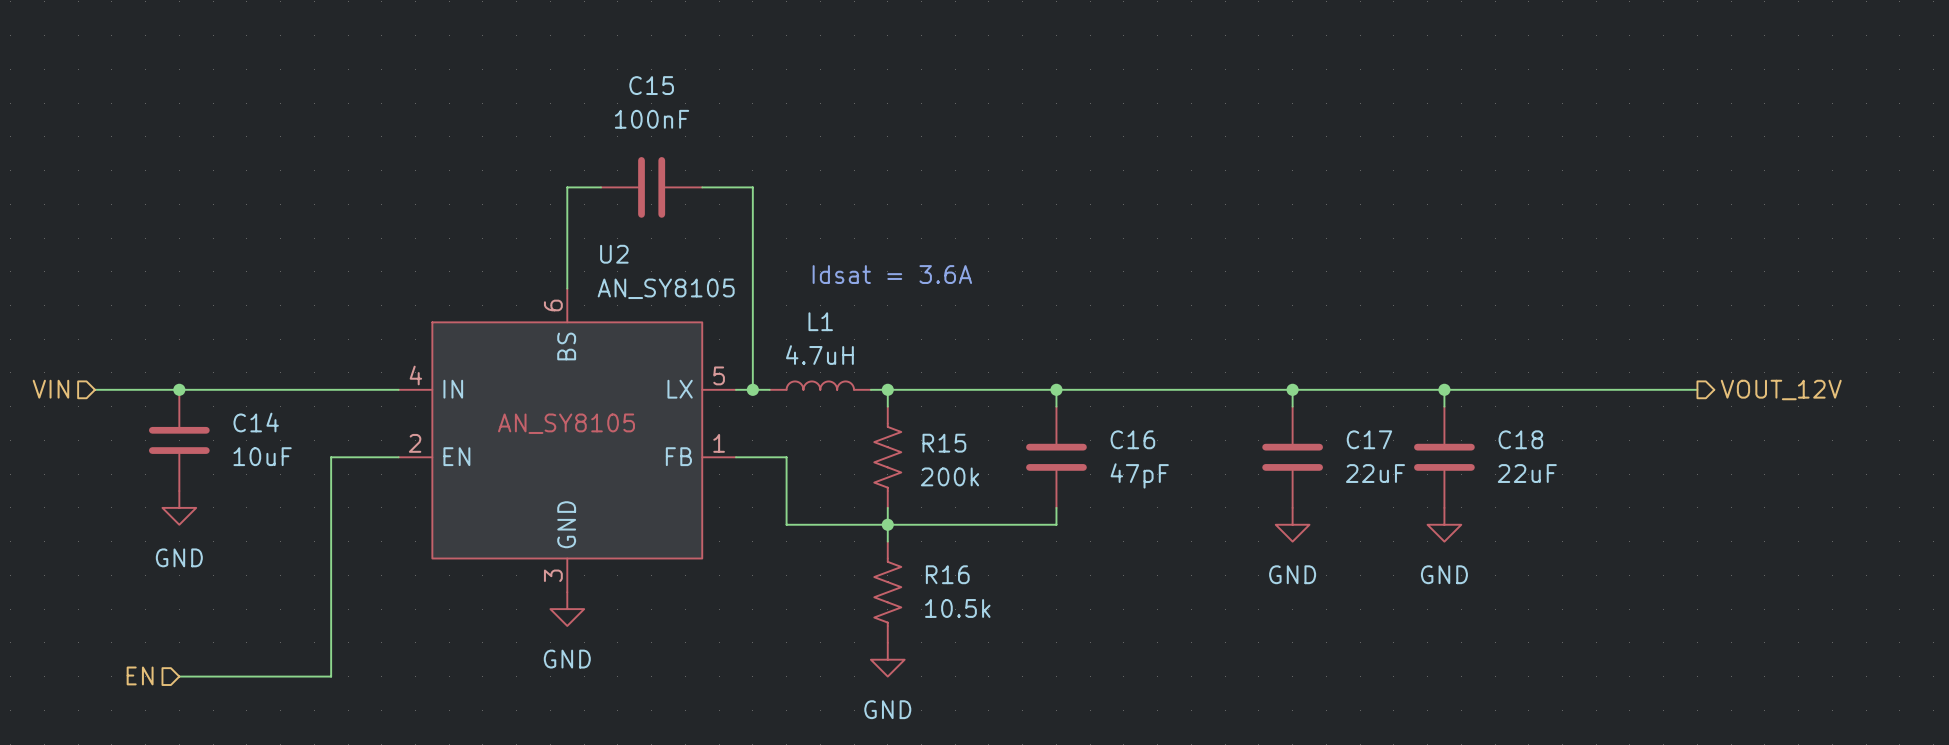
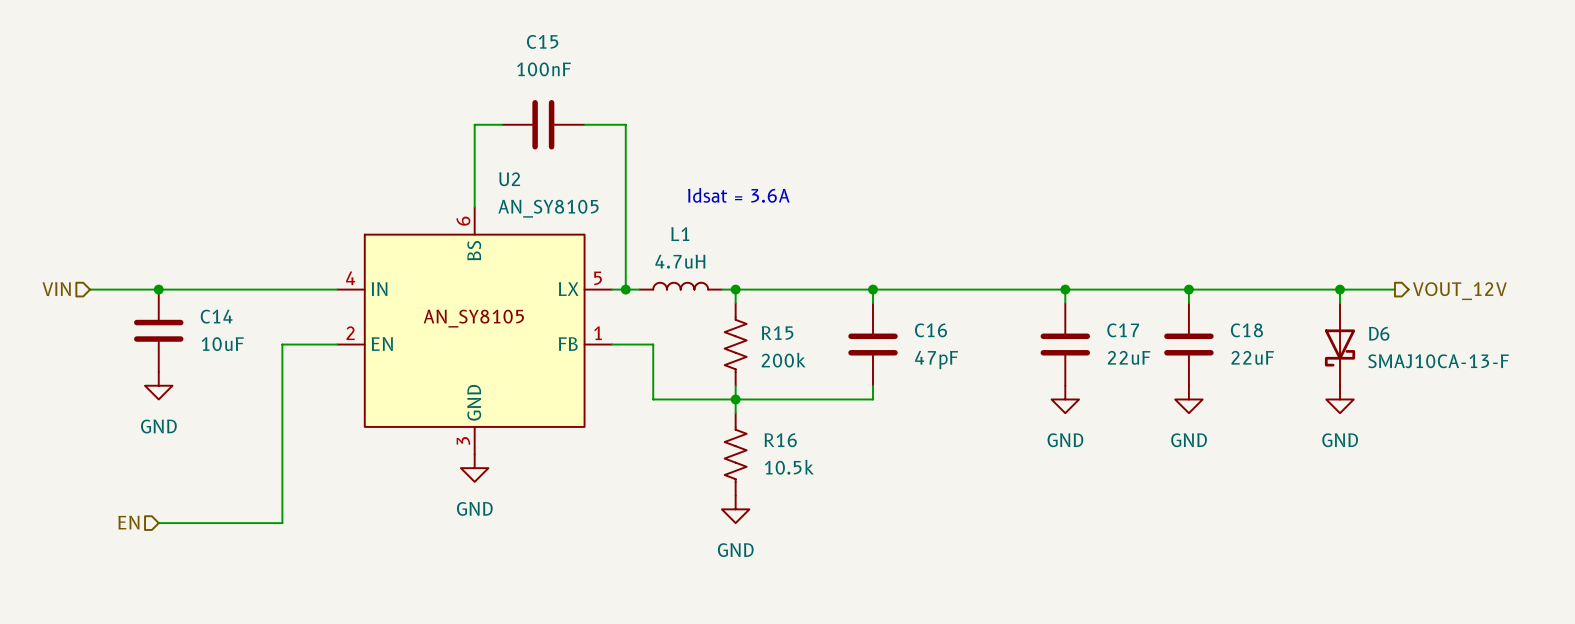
wire: none -> (1340, 289) (1340, 303)
junction: none -> (1340, 289)
D6: none -> SMAJ10CA-13-F (1340, 344)
power symbol: none -> GND (1340, 399)

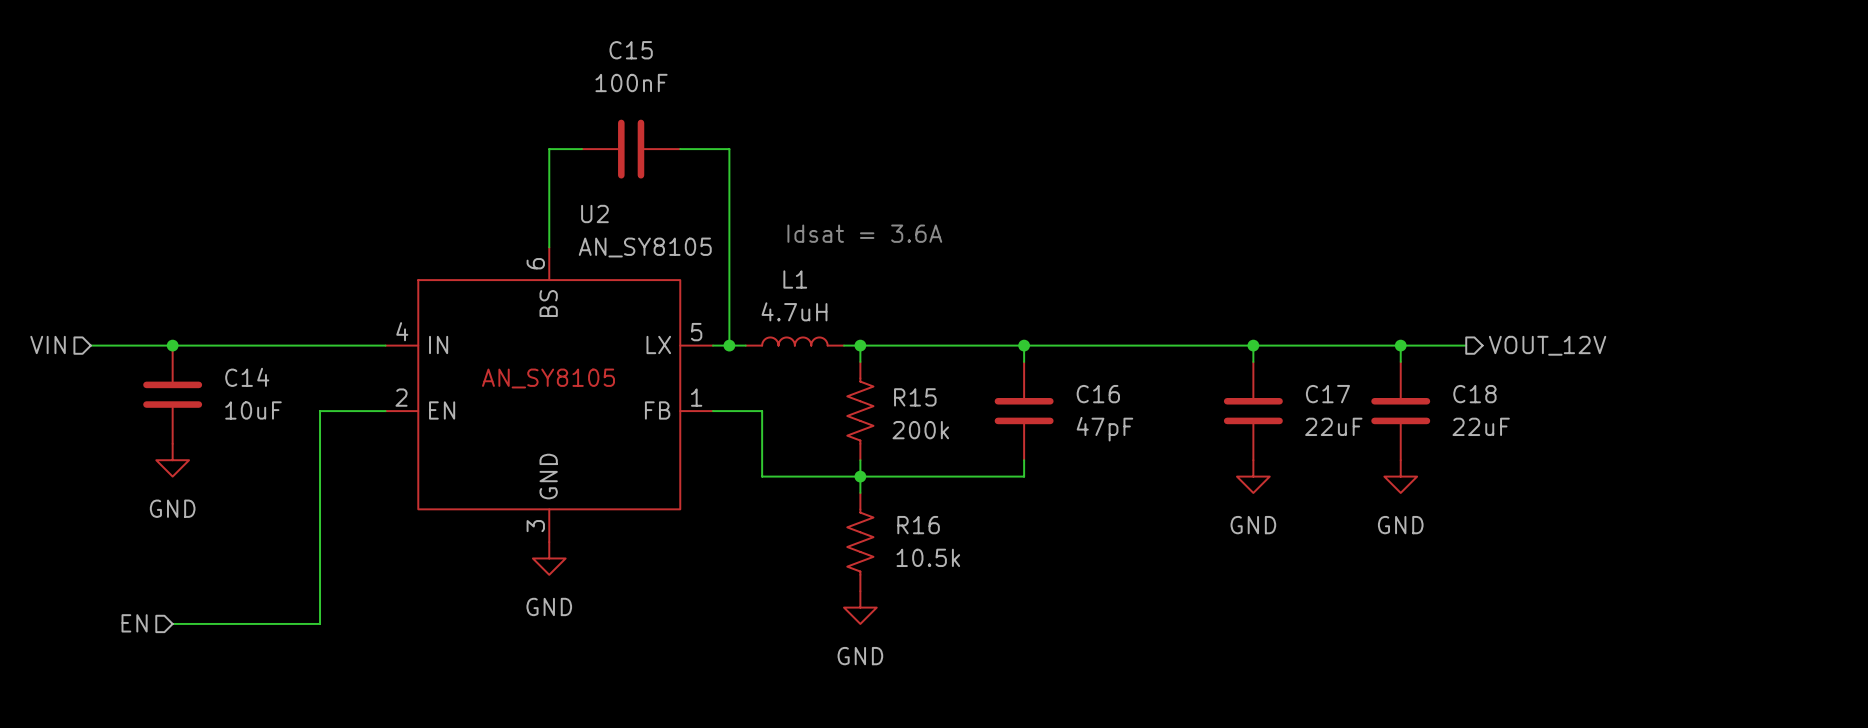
wire: (1243, 289) (1394, 289) -> none
wire: (1340, 289) (1340, 303) -> none
junction: (1340, 289) -> none
hierarchical label position: VOUT_12V (1459, 291) -> VOUT_12V (1547, 345)
D6: SMAJ10CA-13-F (1340, 344) -> none
power symbol: GND (1340, 399) -> none

